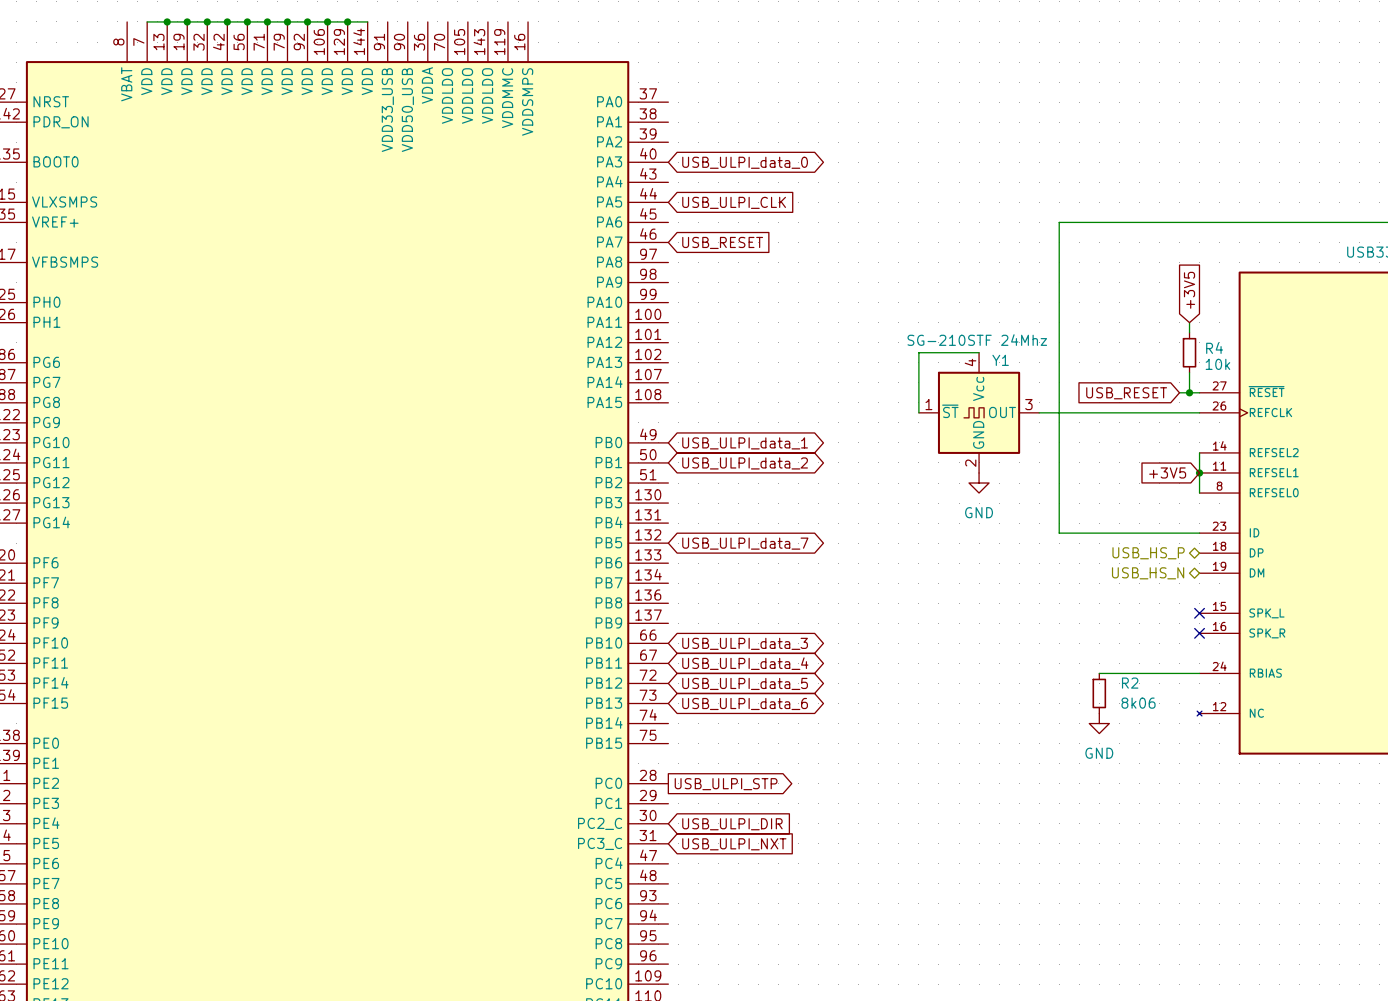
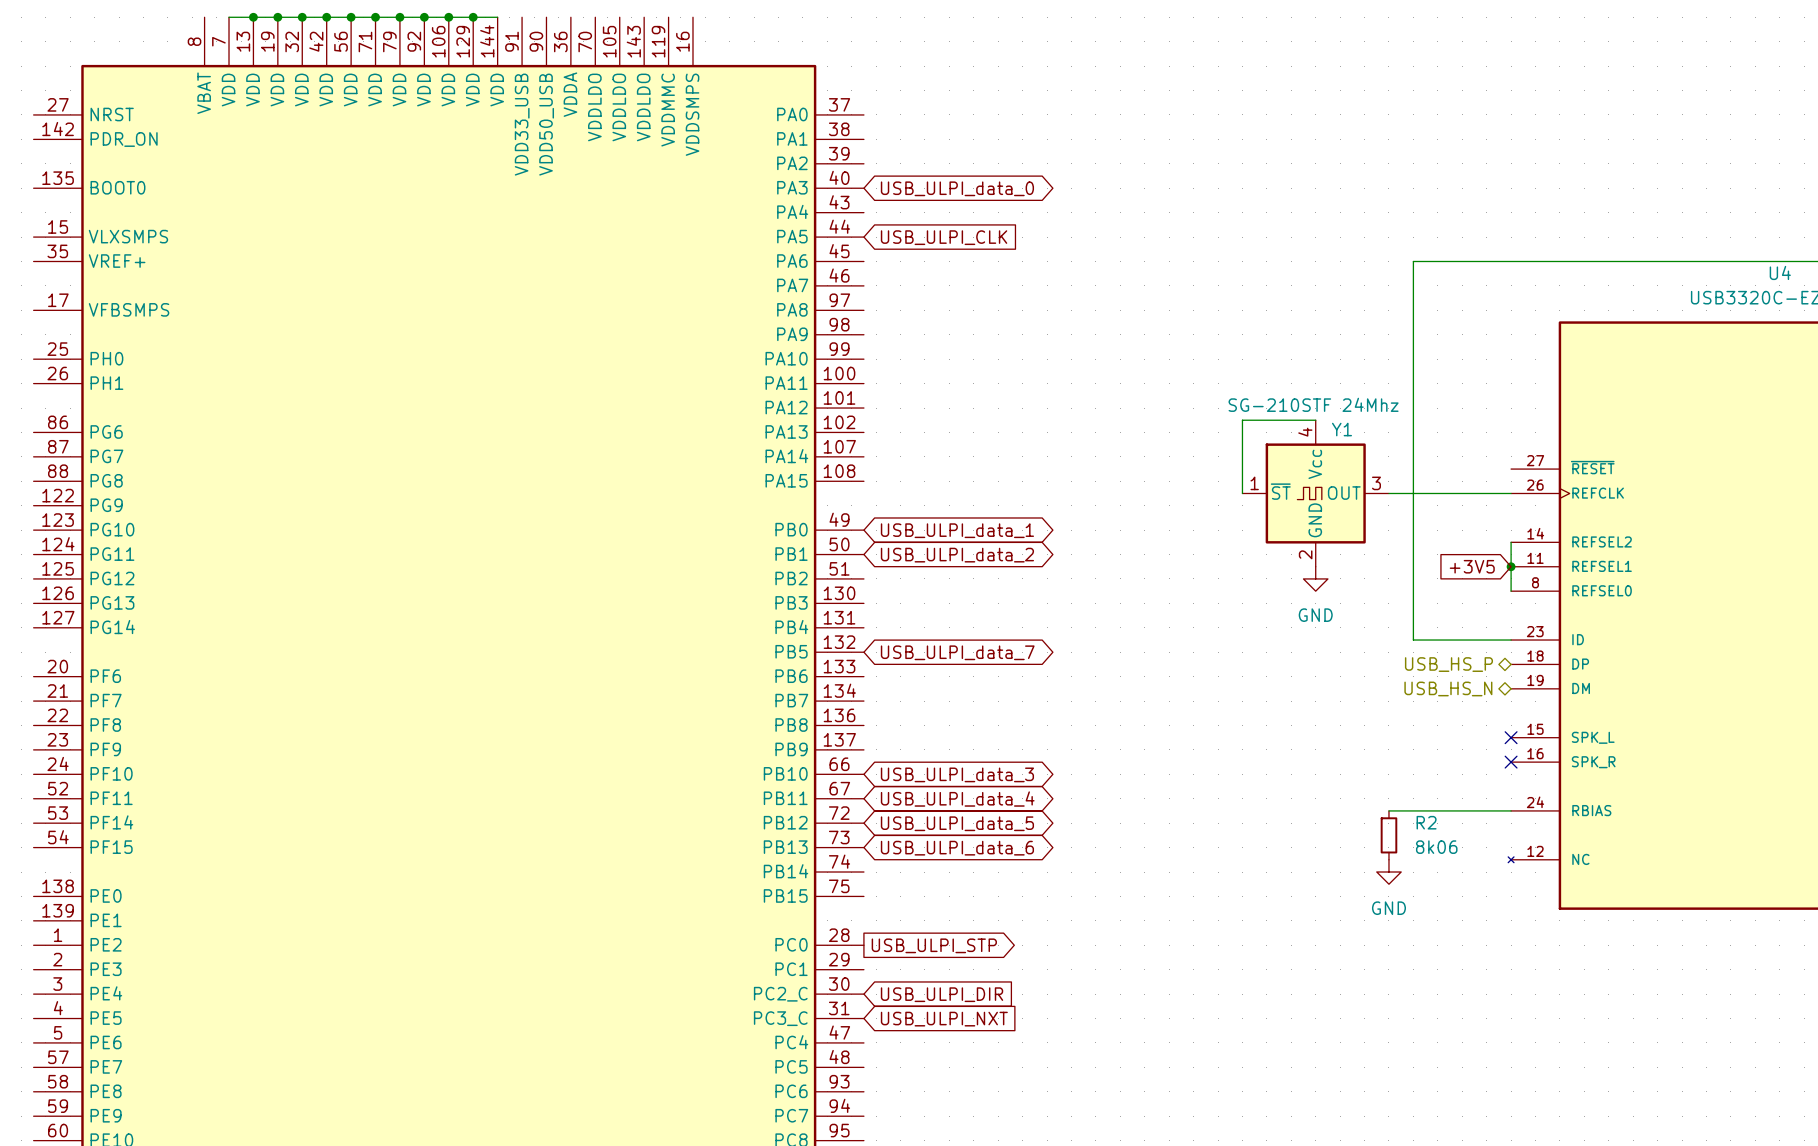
wire: (1119, 222) (1059, 222) (1059, 533) (1119, 533) -> (1413, 261) (1413, 640)
global label: USB_RESET (722, 242) -> none
global label: +3V5 (1189, 290) -> none
wire: (1189, 322) (1189, 332) -> none
wire: (979, 352) (918, 352) (918, 412) -> (1315, 420) (1242, 420) (1242, 493)
R4: 10k (1189, 352) -> none
wire: (1189, 372) (1189, 392) -> none
wire: (1179, 392) (1199, 392) -> none
junction: (1189, 392) -> none
global label: USB_RESET (1126, 393) -> none
Y1 position: (979, 412) -> (1315, 493)
power symbol position: GND (979, 483) -> GND (1315, 578)

